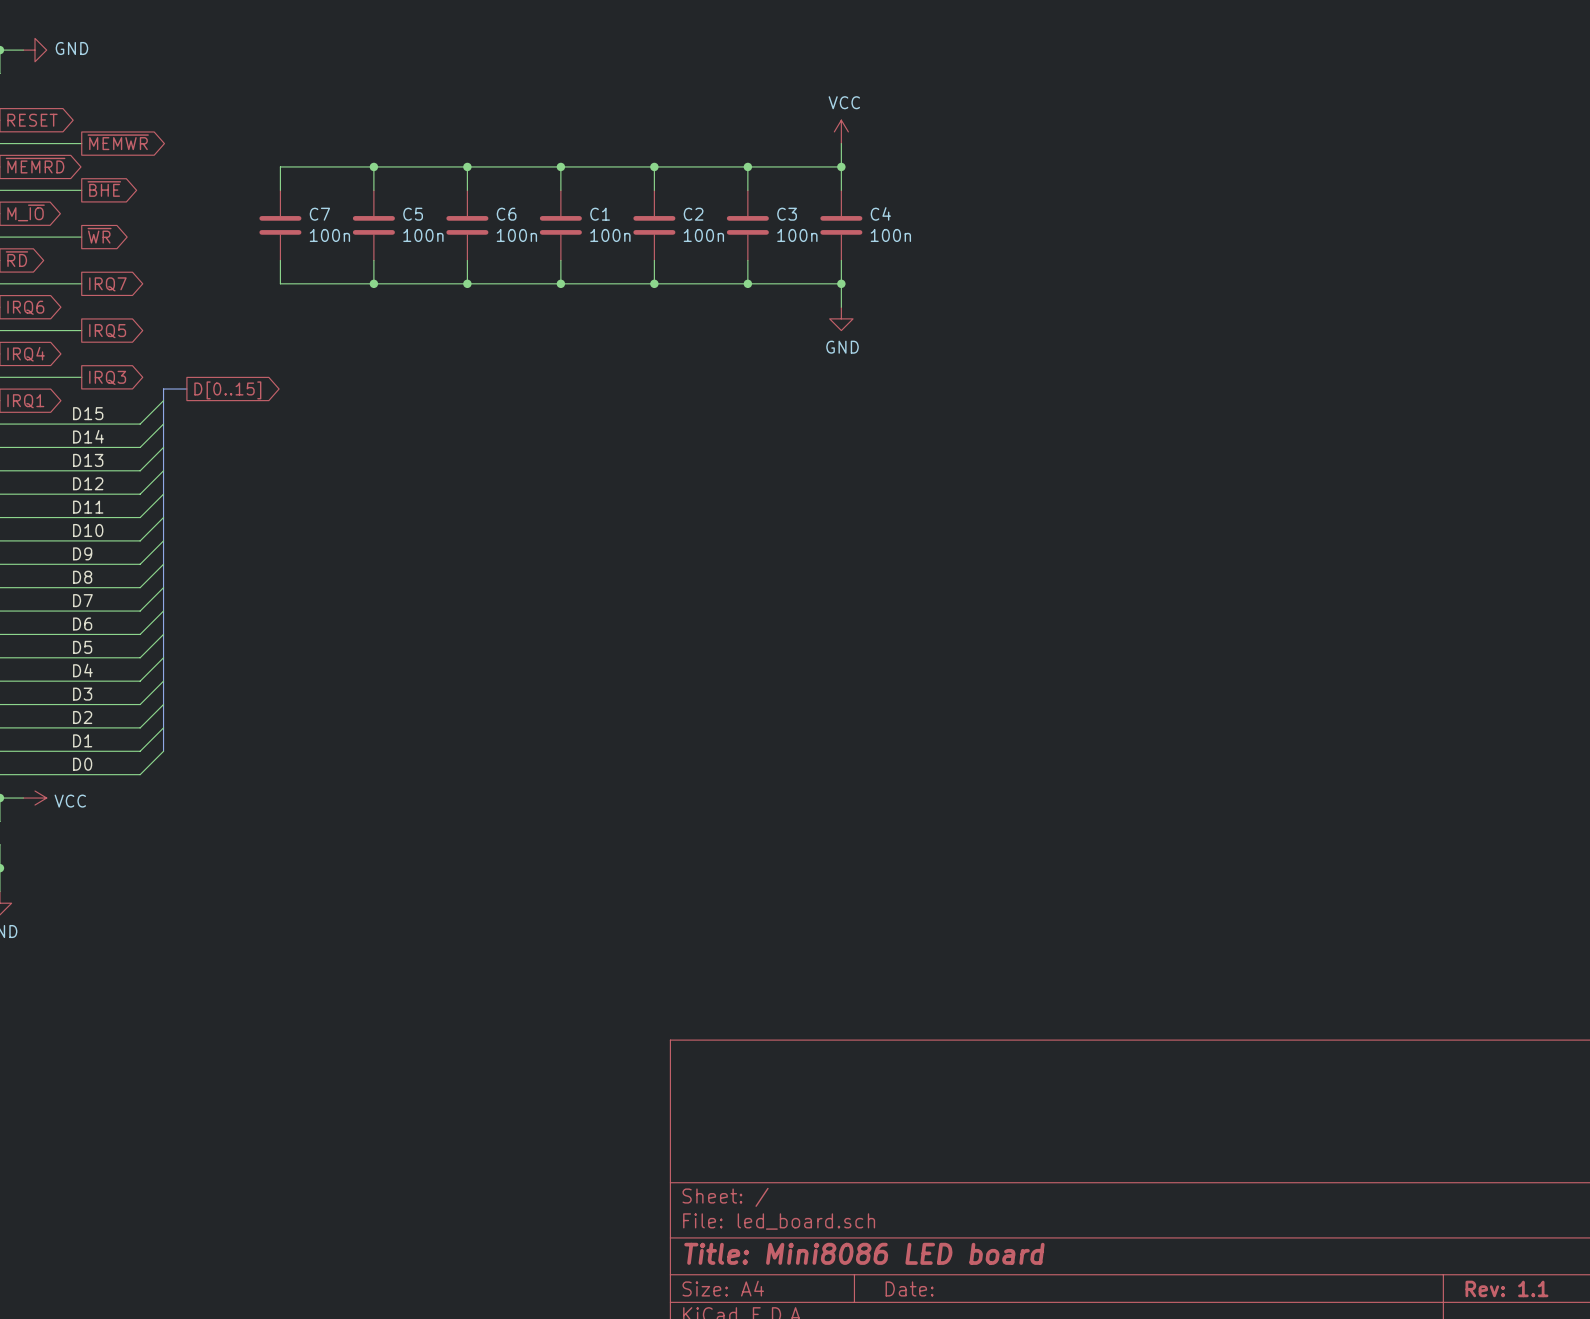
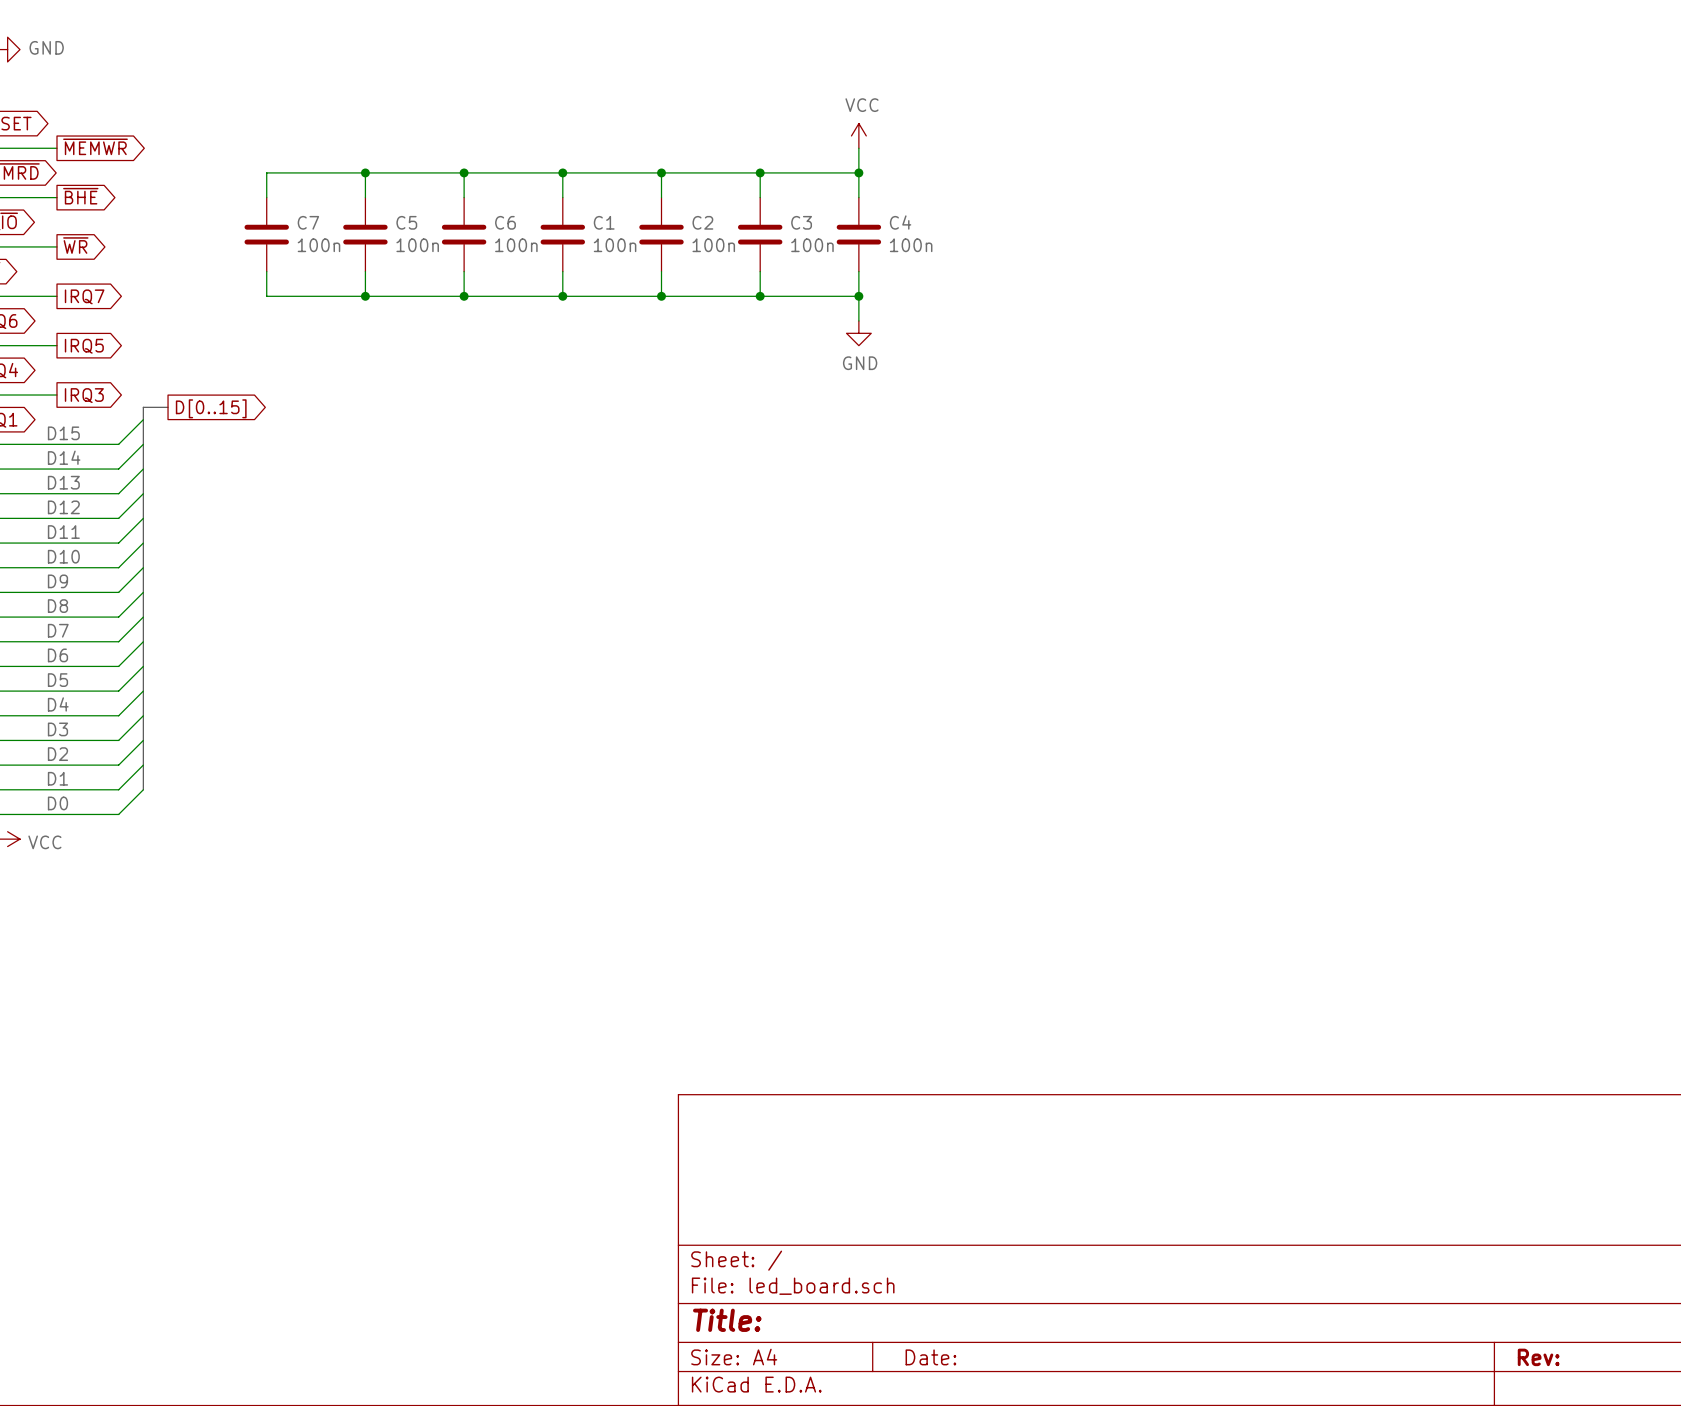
title block: Title: Mini8086 LED board (864, 1253) -> Title: (727, 1320)
title block: Rev: 1.1 (1506, 1288) -> Rev: (1538, 1357)

